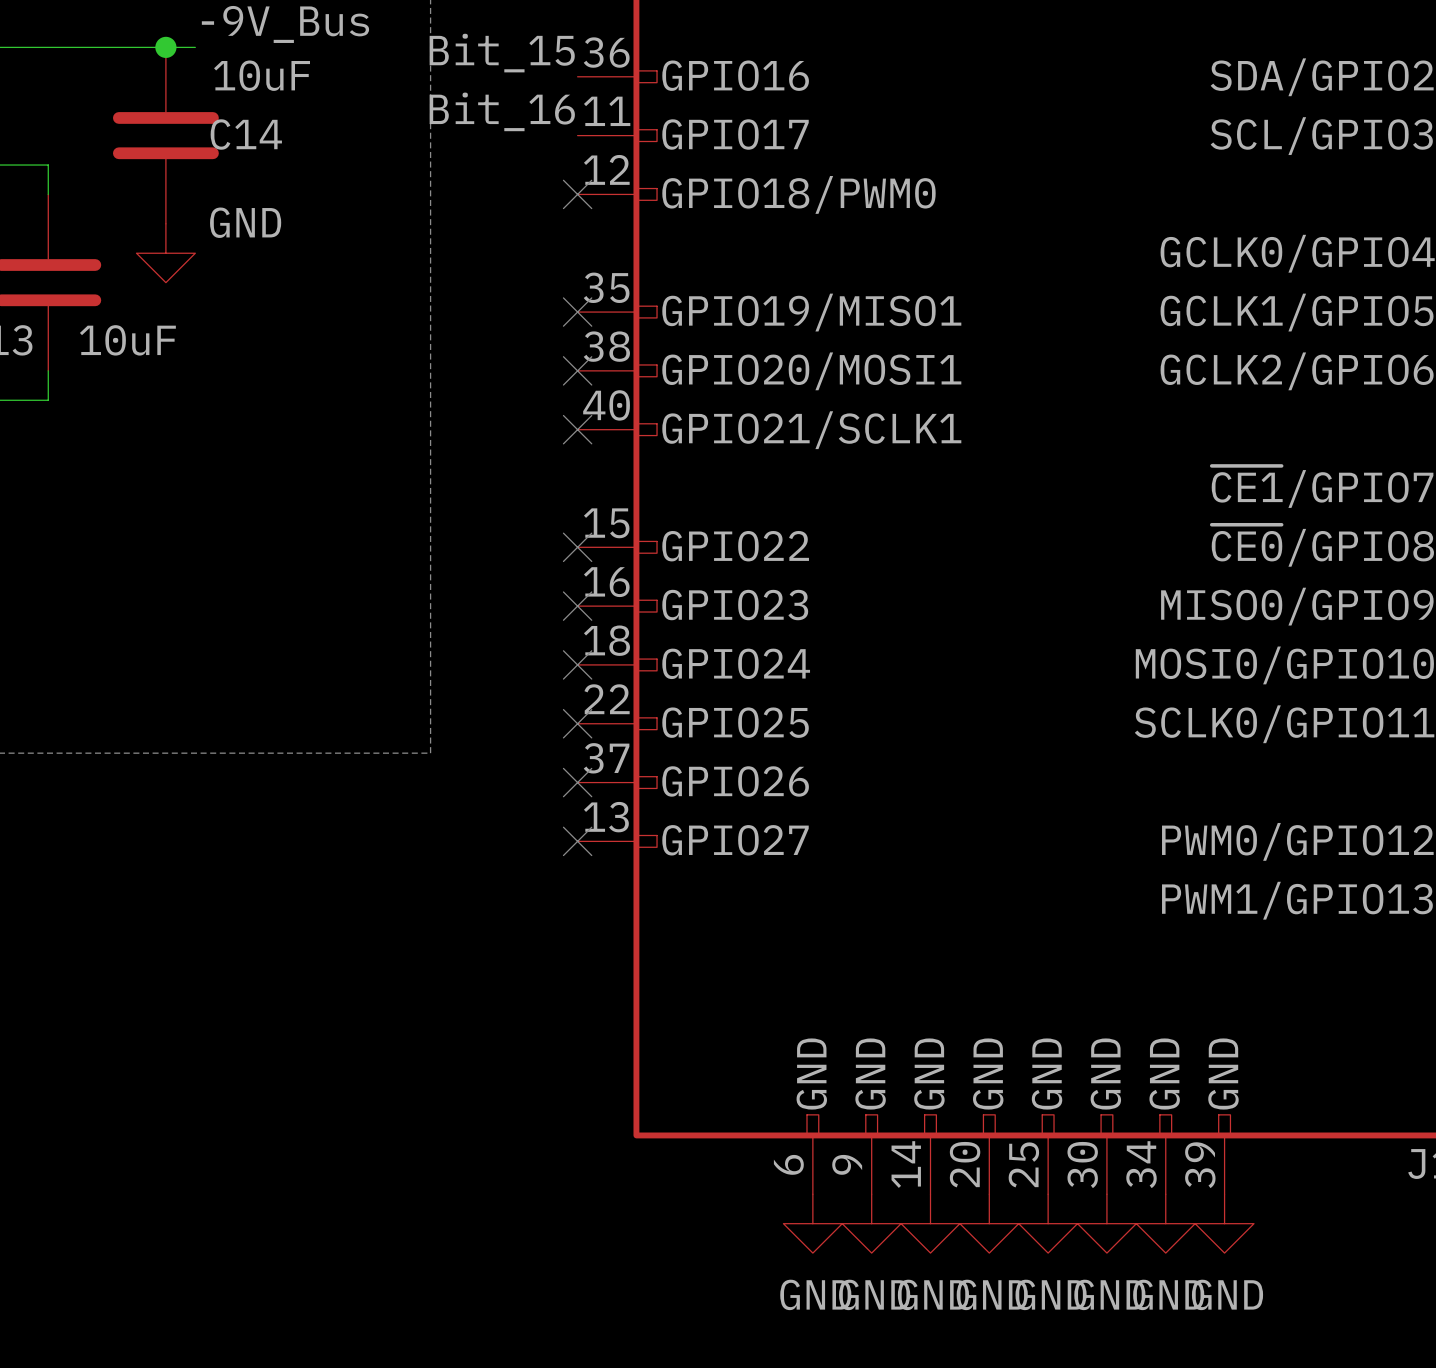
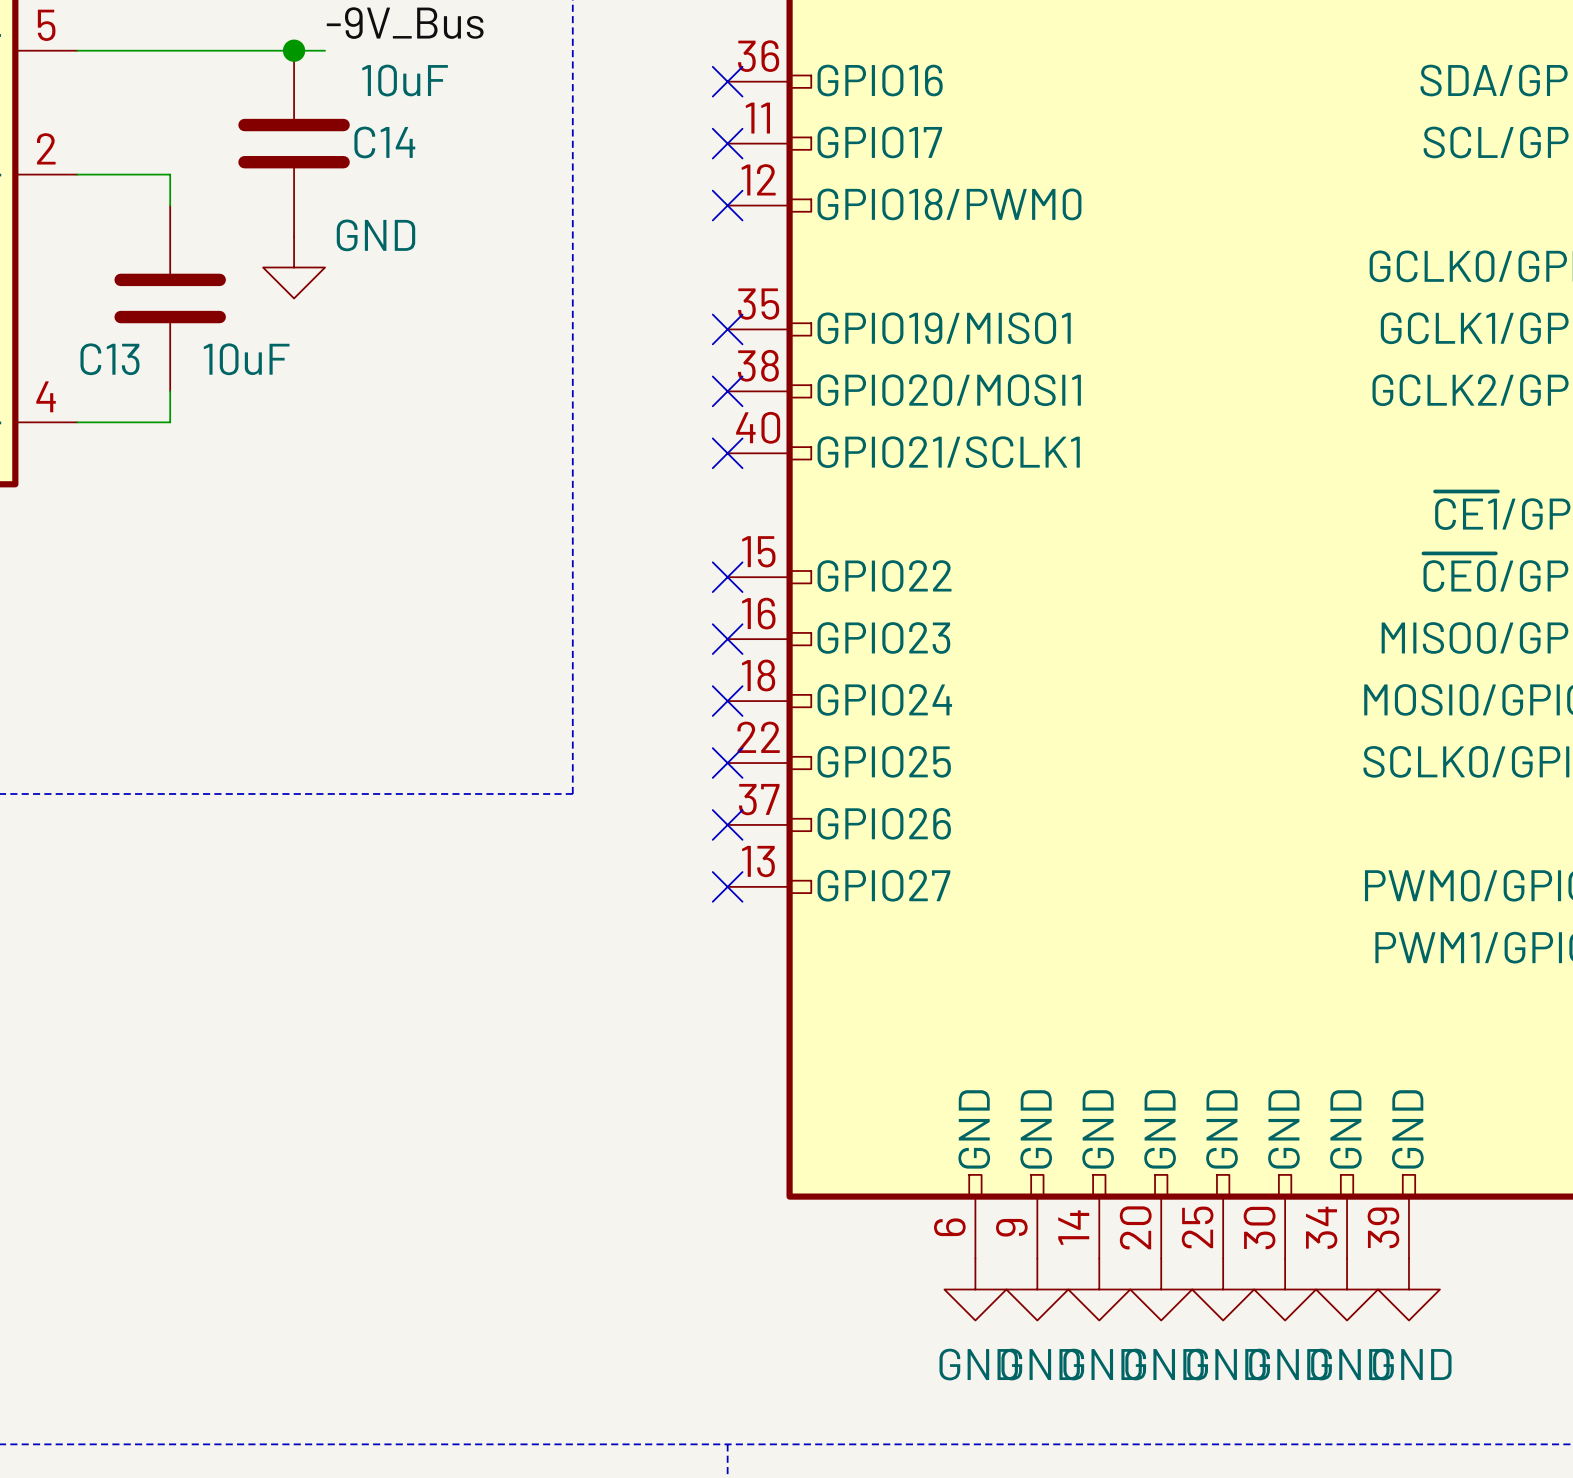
label: Bit_15 (502, 53) -> none
no-connect mark: none -> (727, 81)
label: Bit_16 (502, 111) -> none
no-connect mark: none -> (727, 143)

